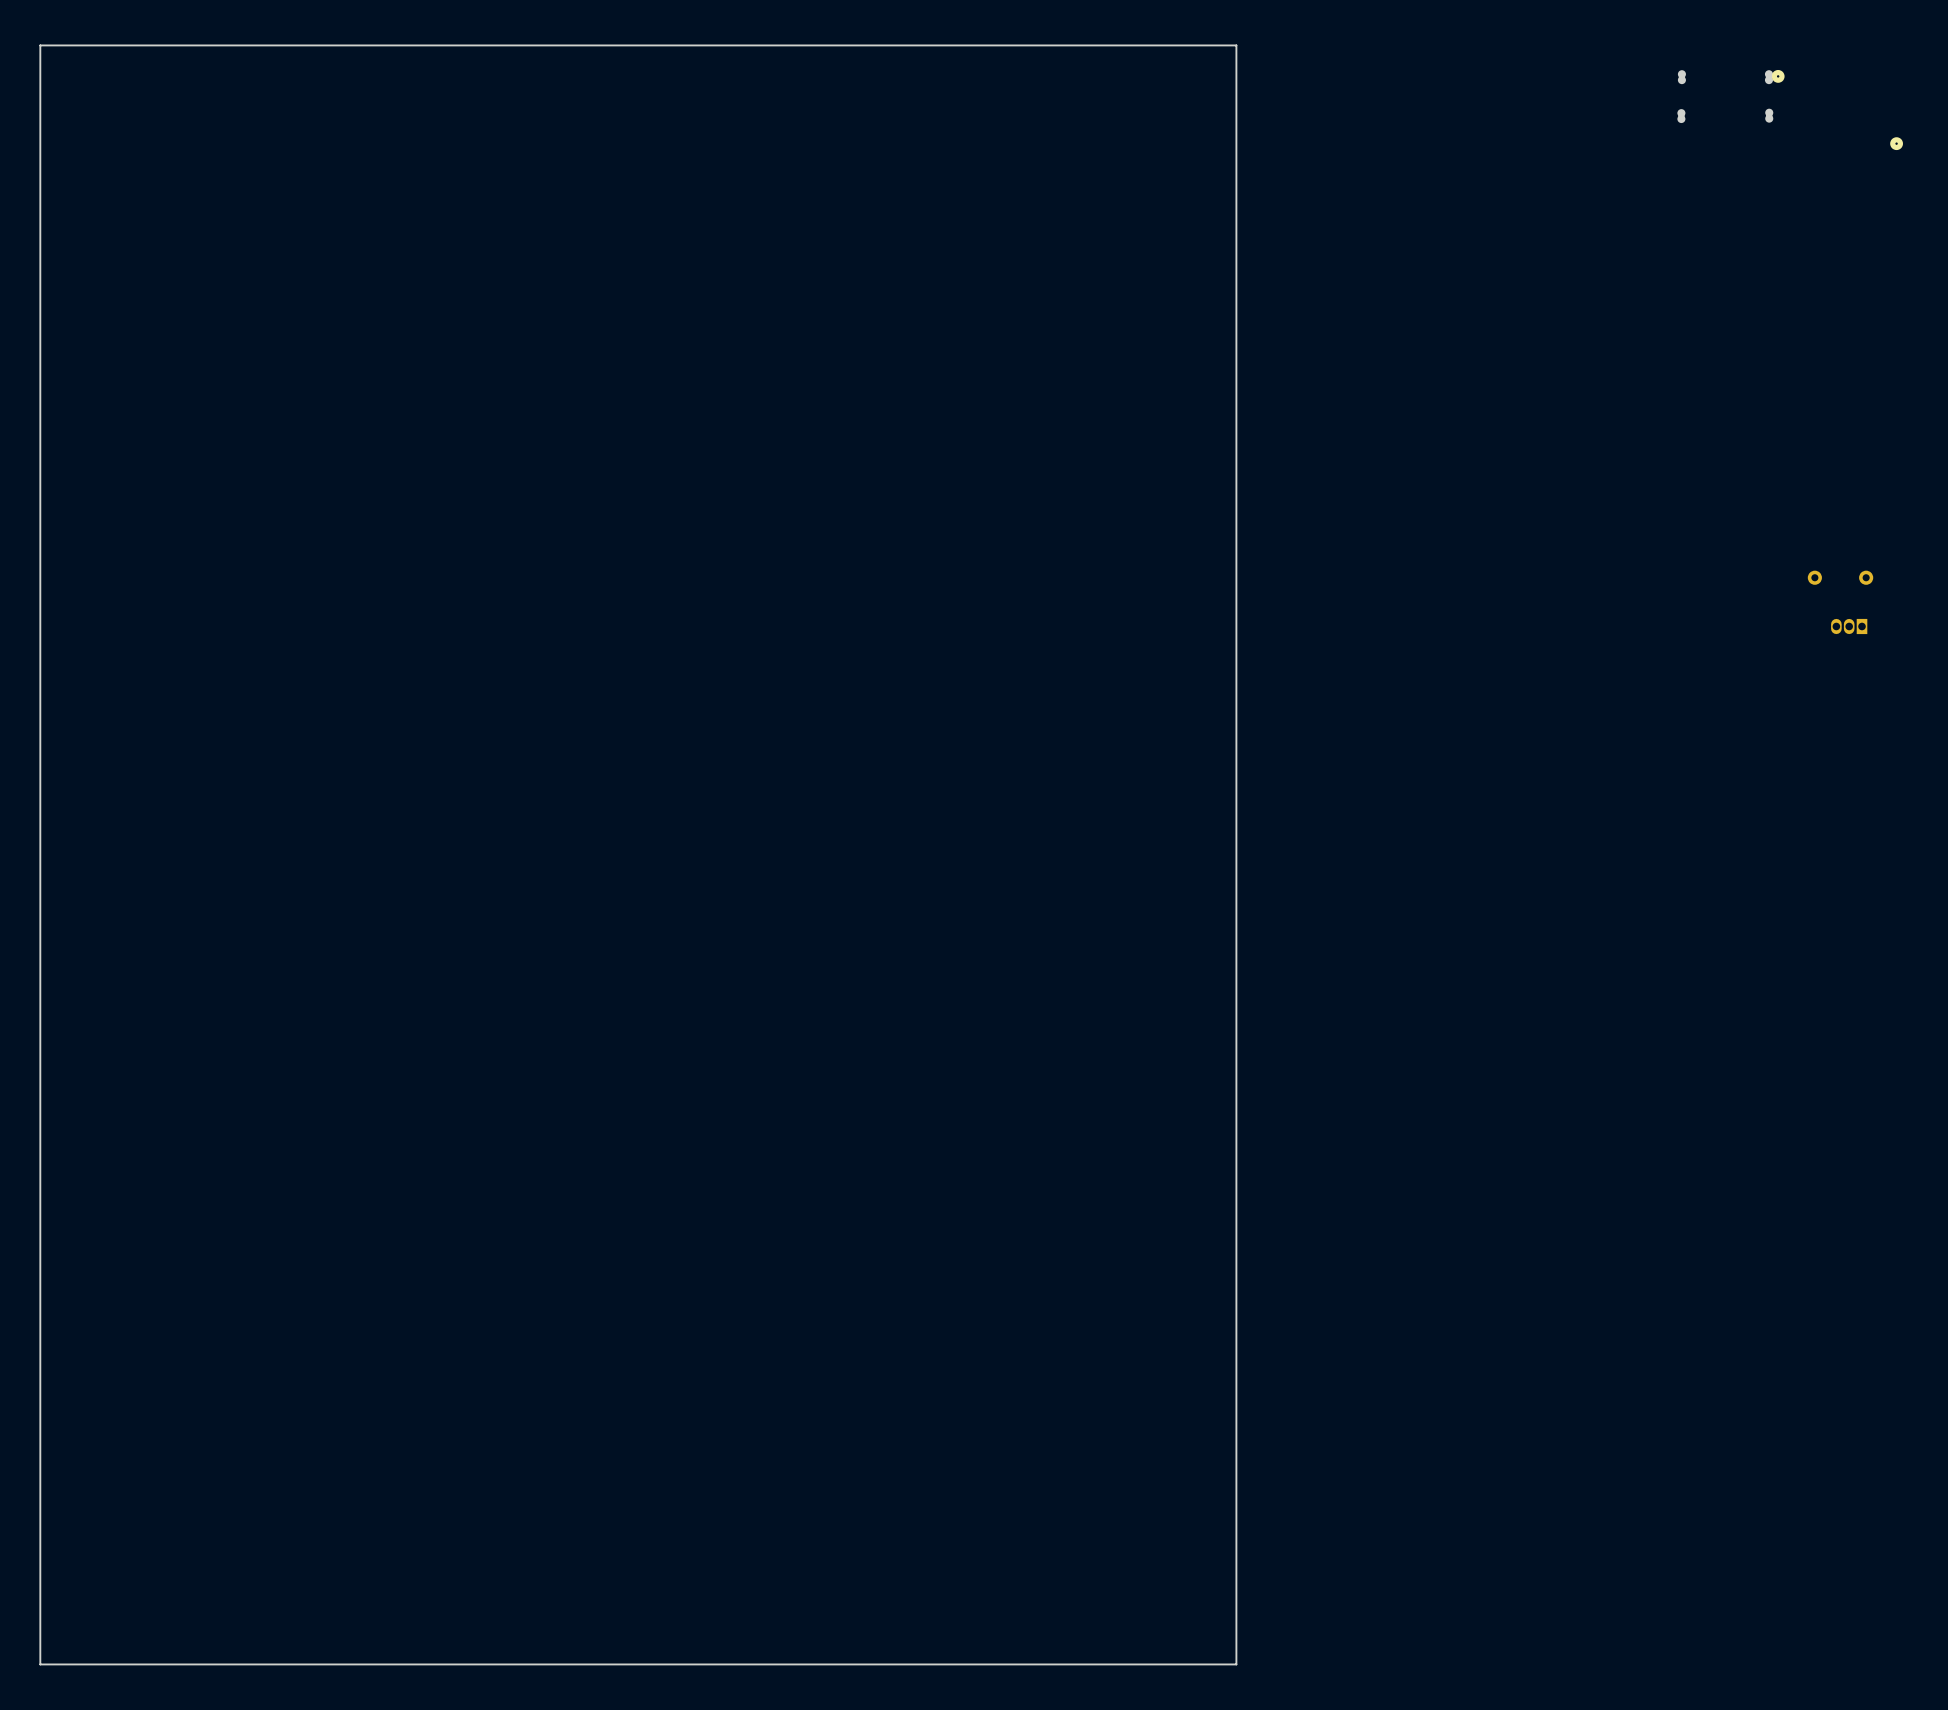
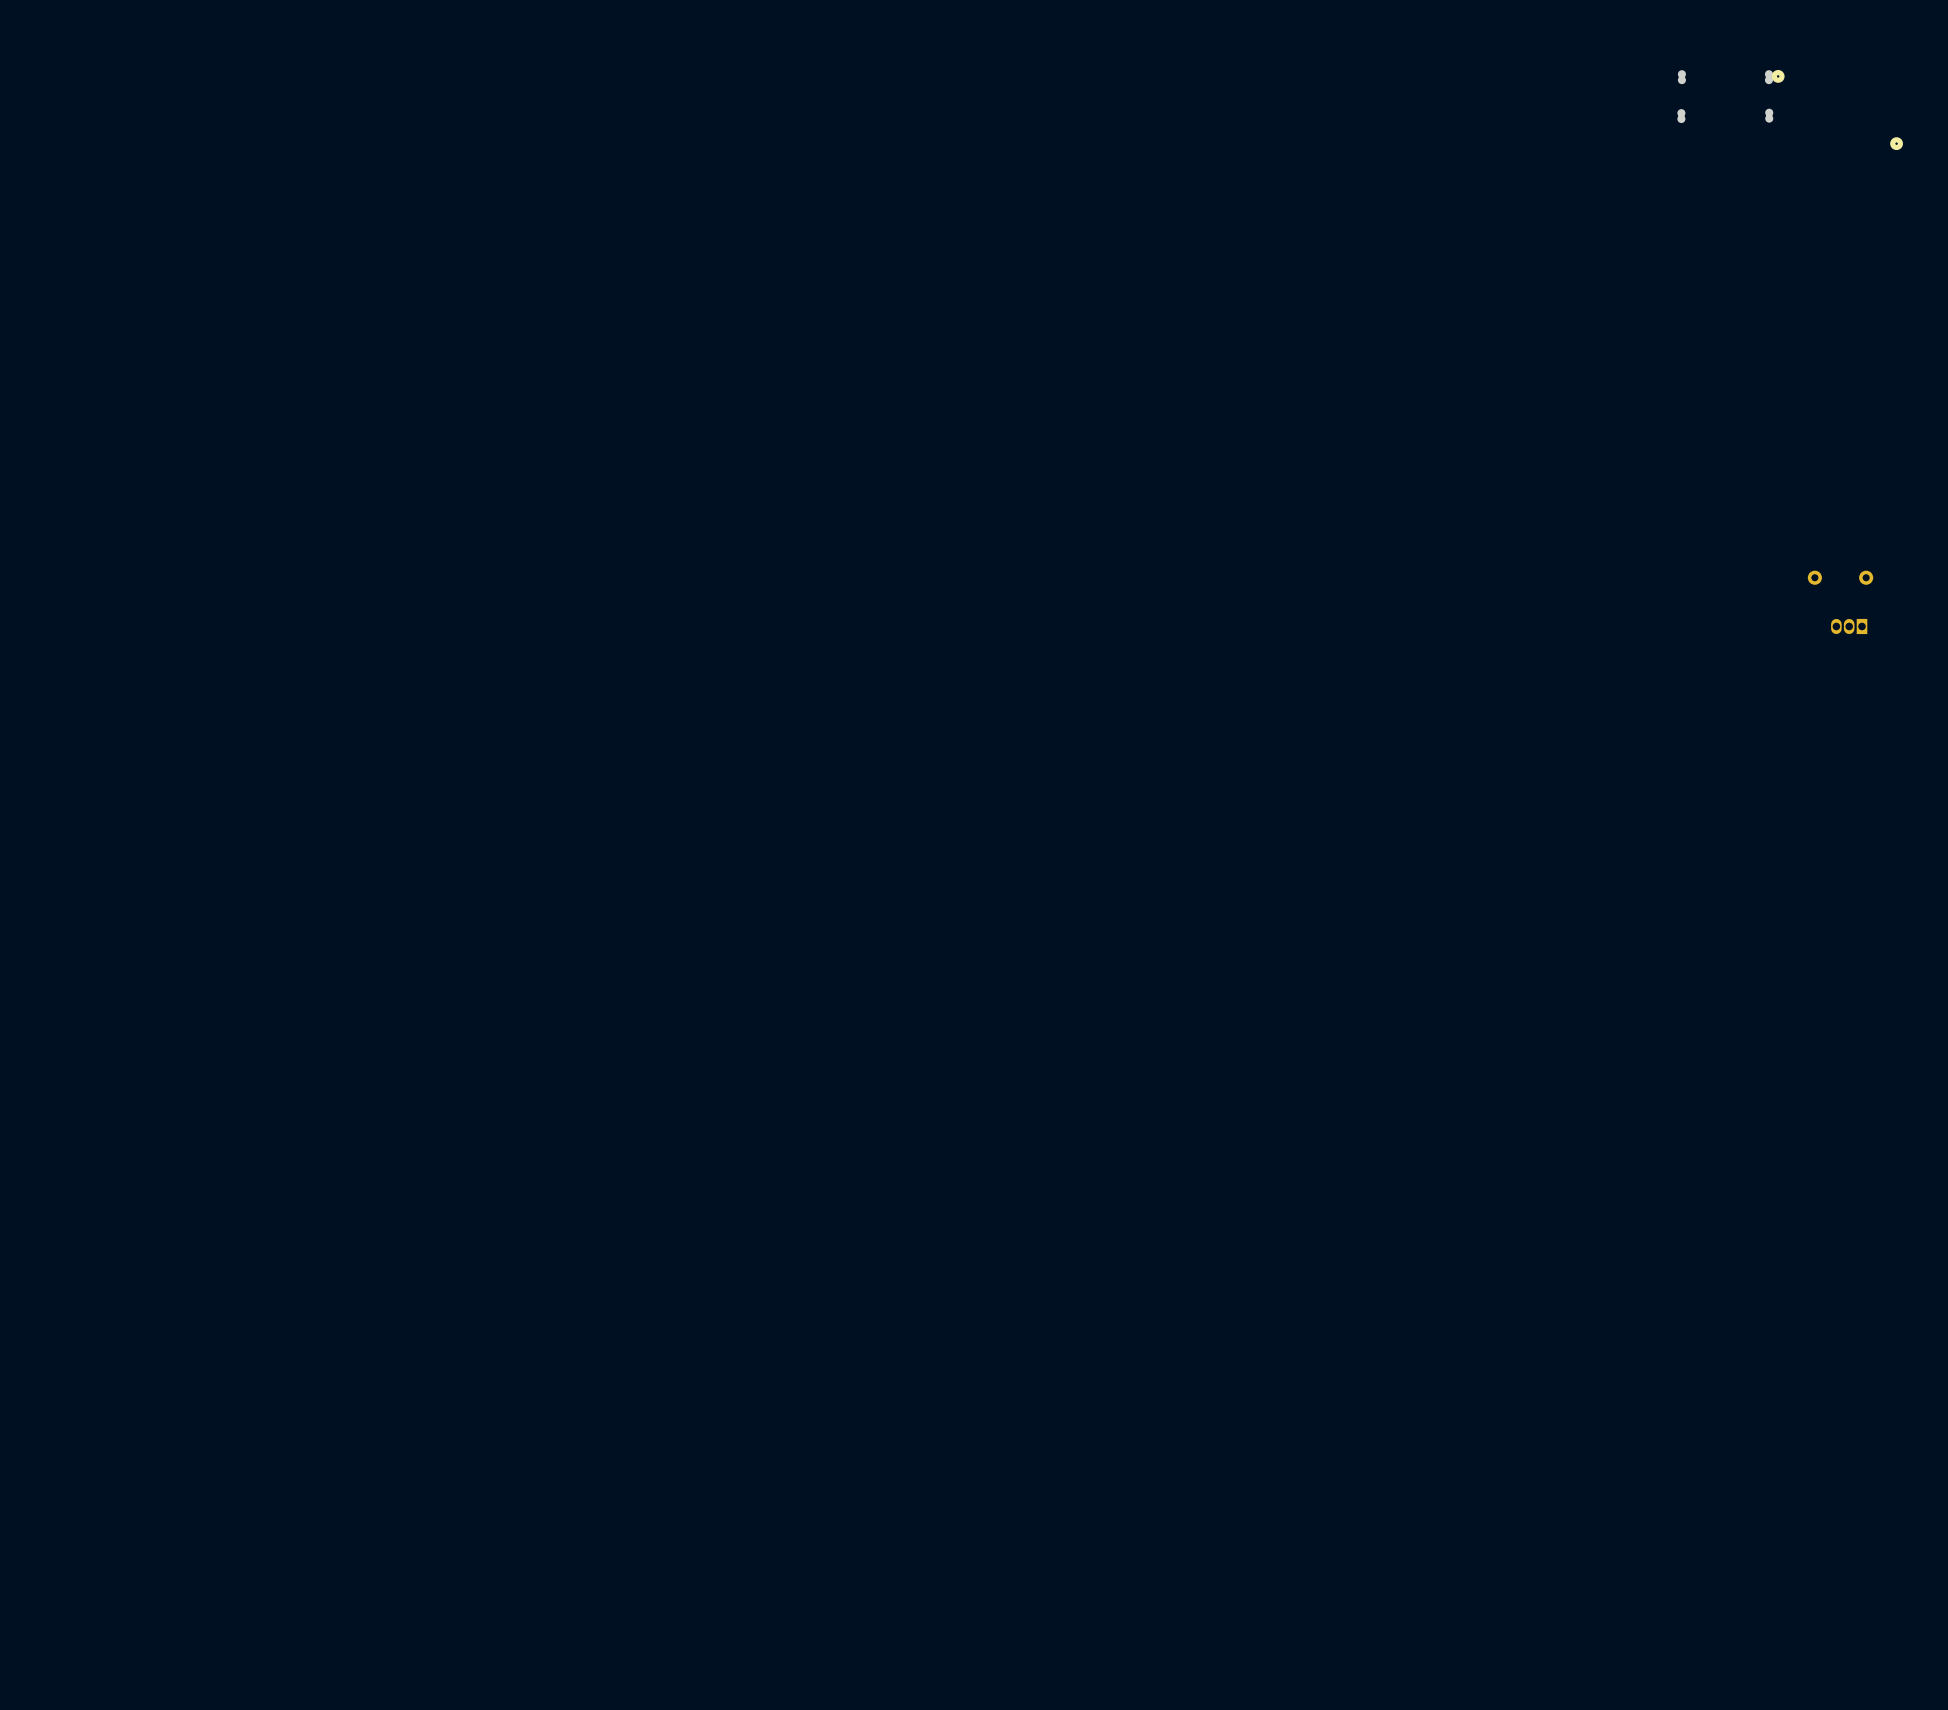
board edge: (1236, 45) (40, 45) (40, 1664) (1236, 1664) (1236, 45) -> none

